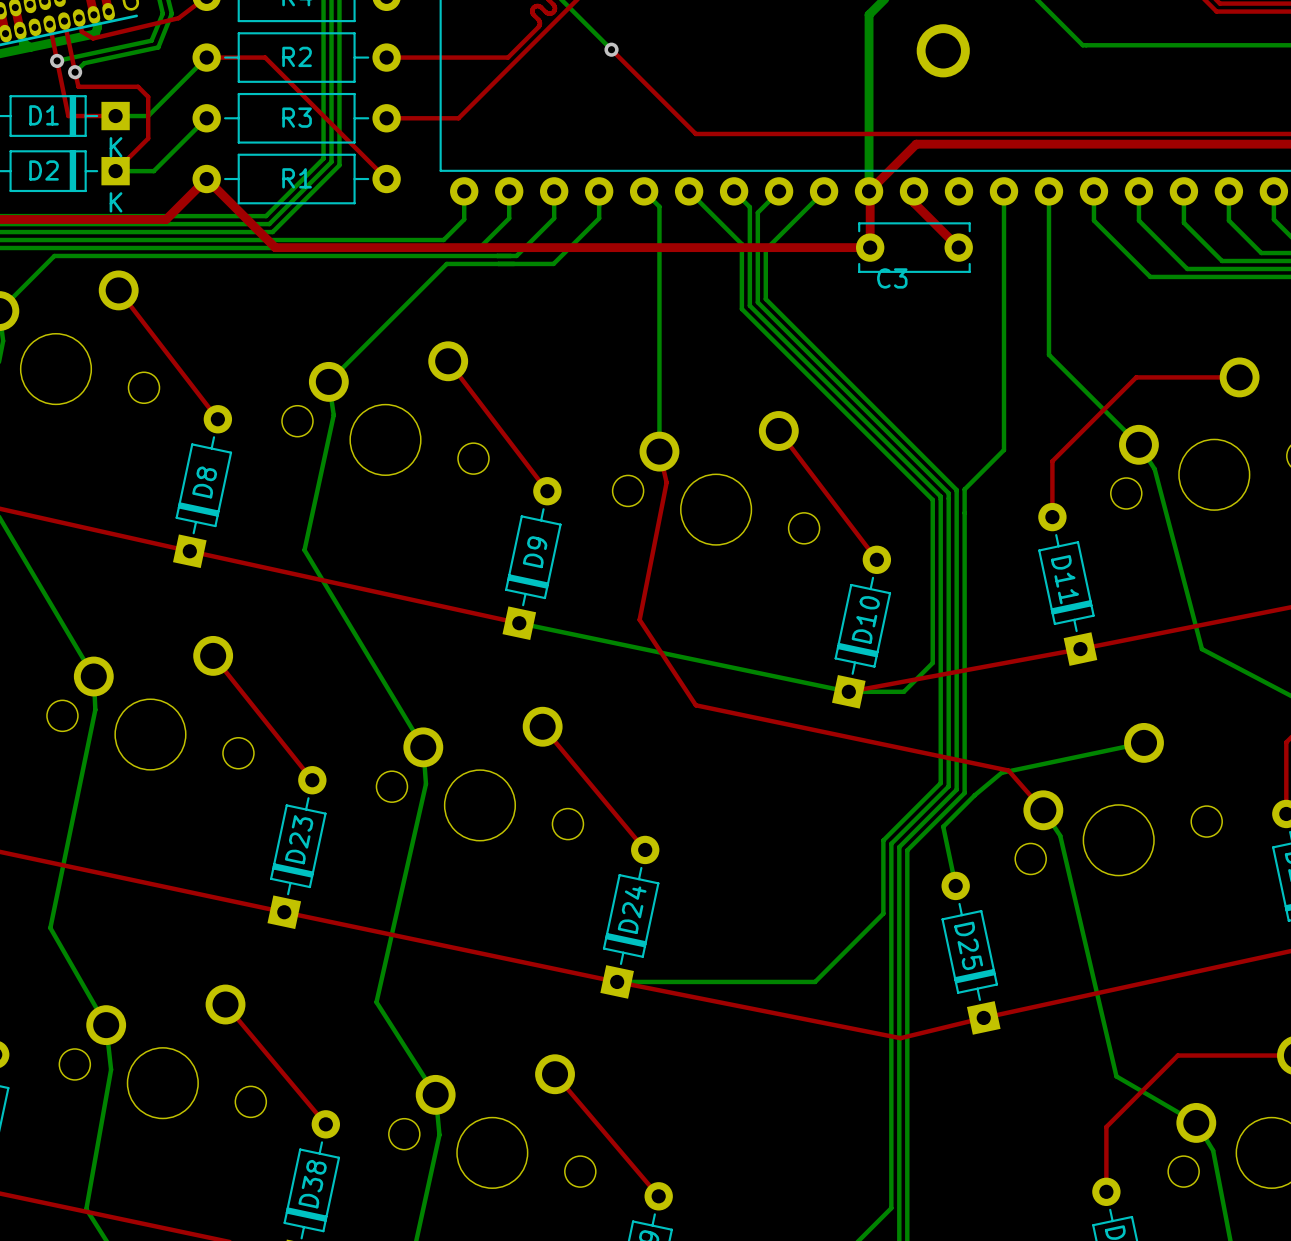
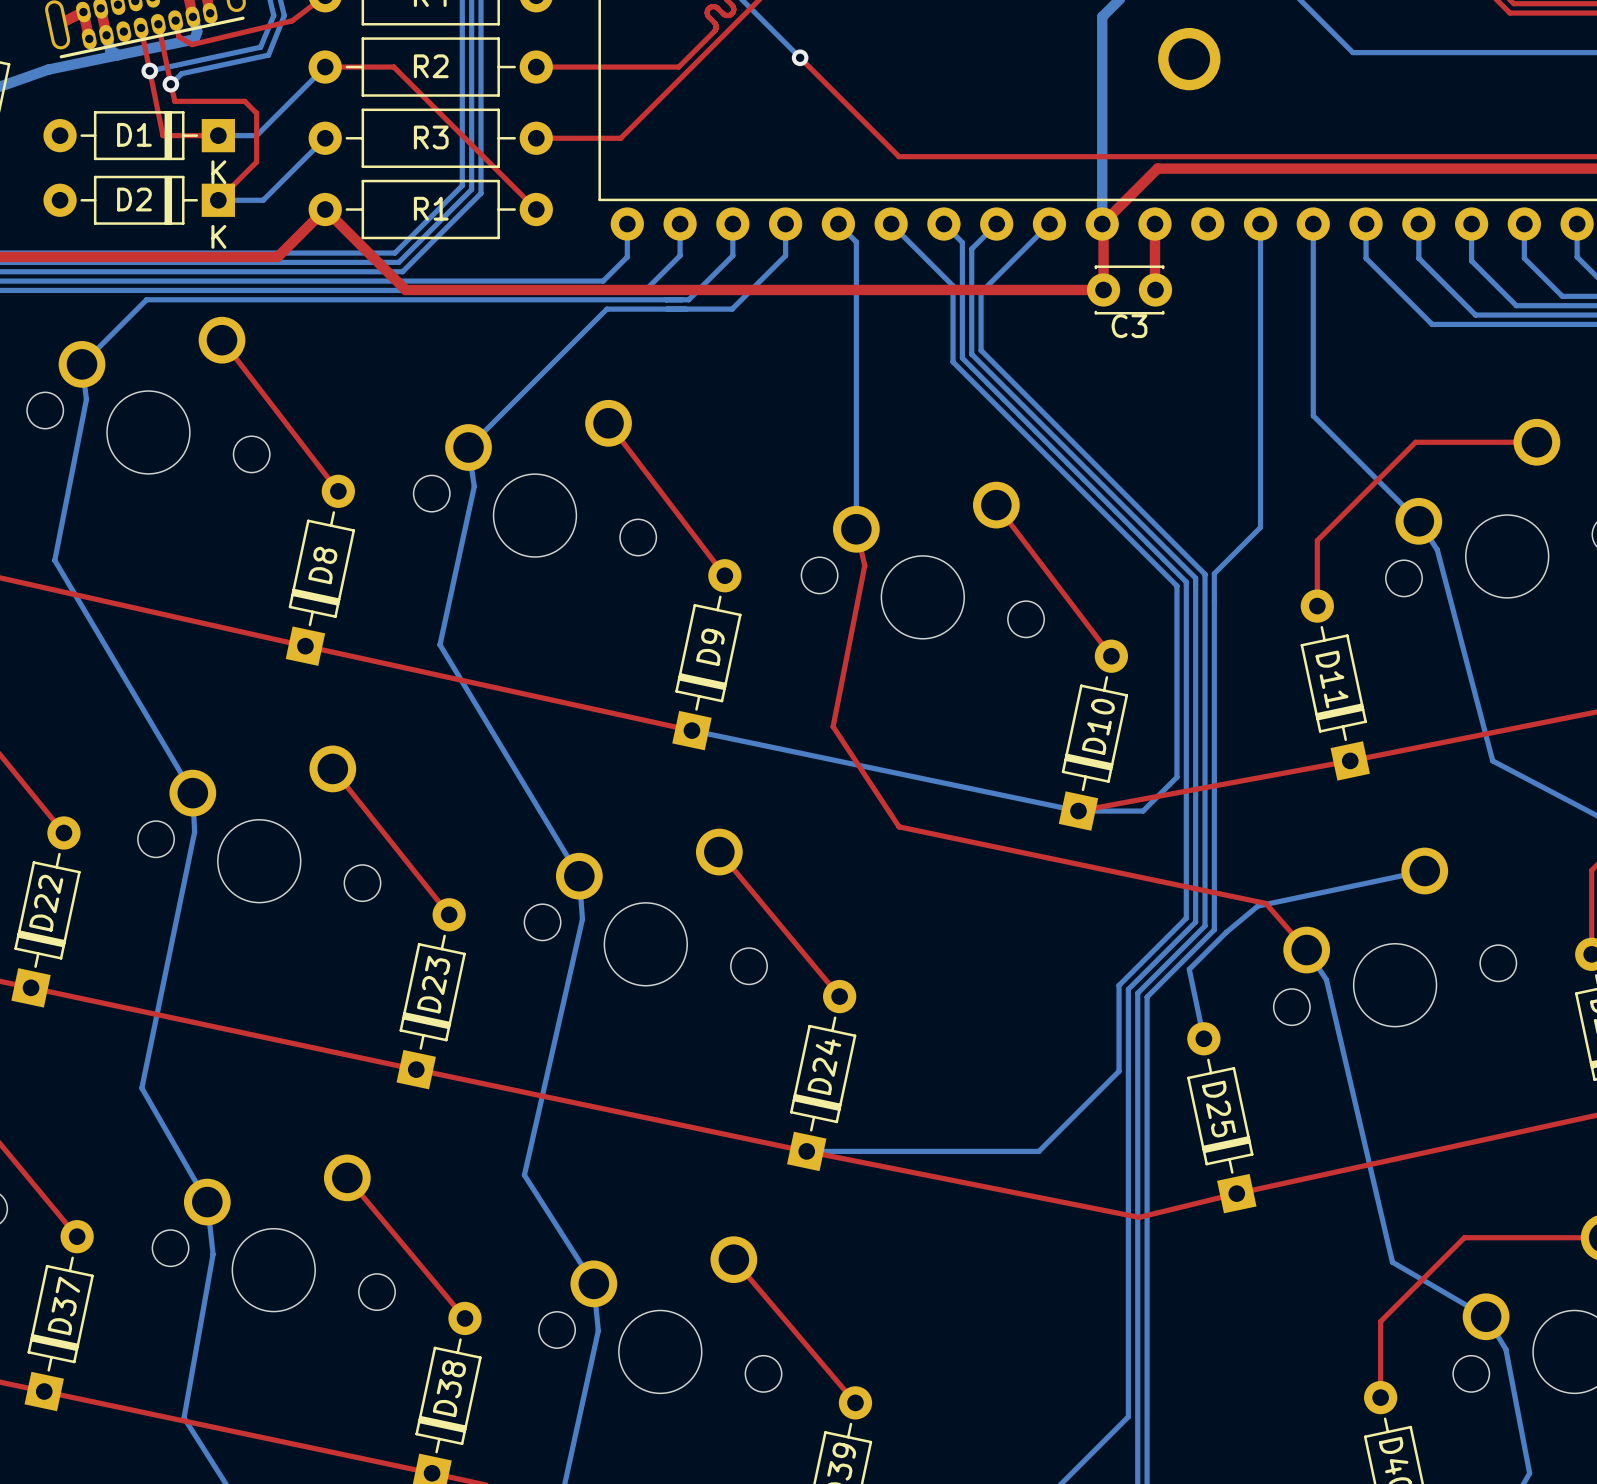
top track: (914, 202) (958, 247) -> (1154, 237) (1155, 289)
C3 footprint: [856, 222, 973, 273] -> [1086, 265, 1173, 315]

